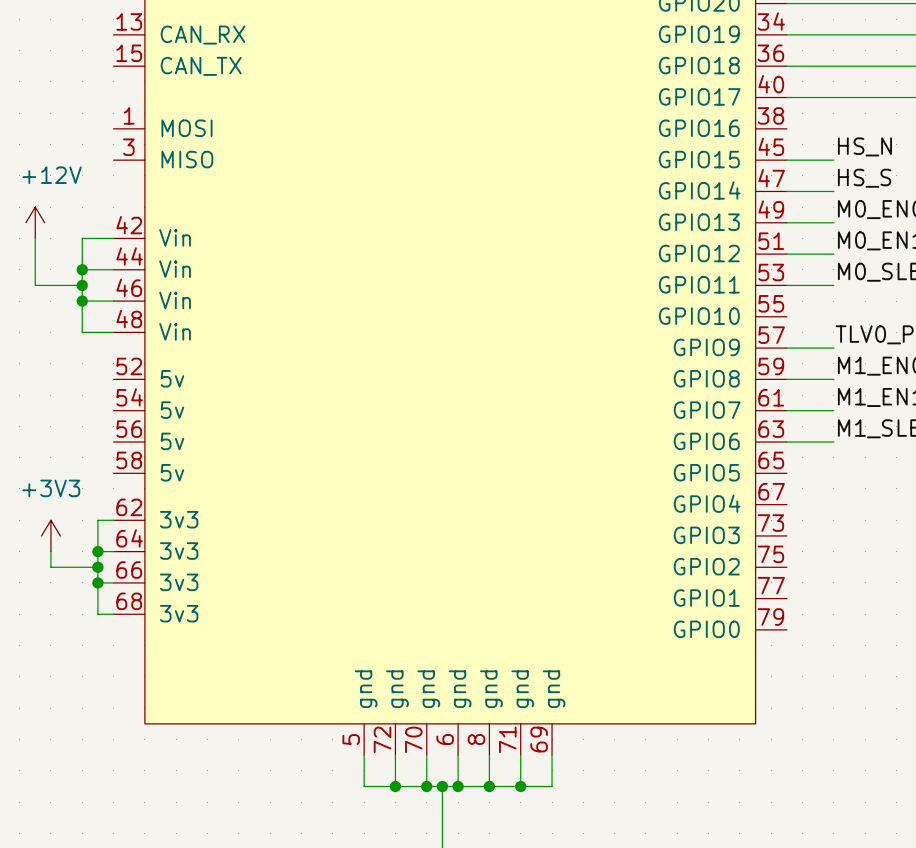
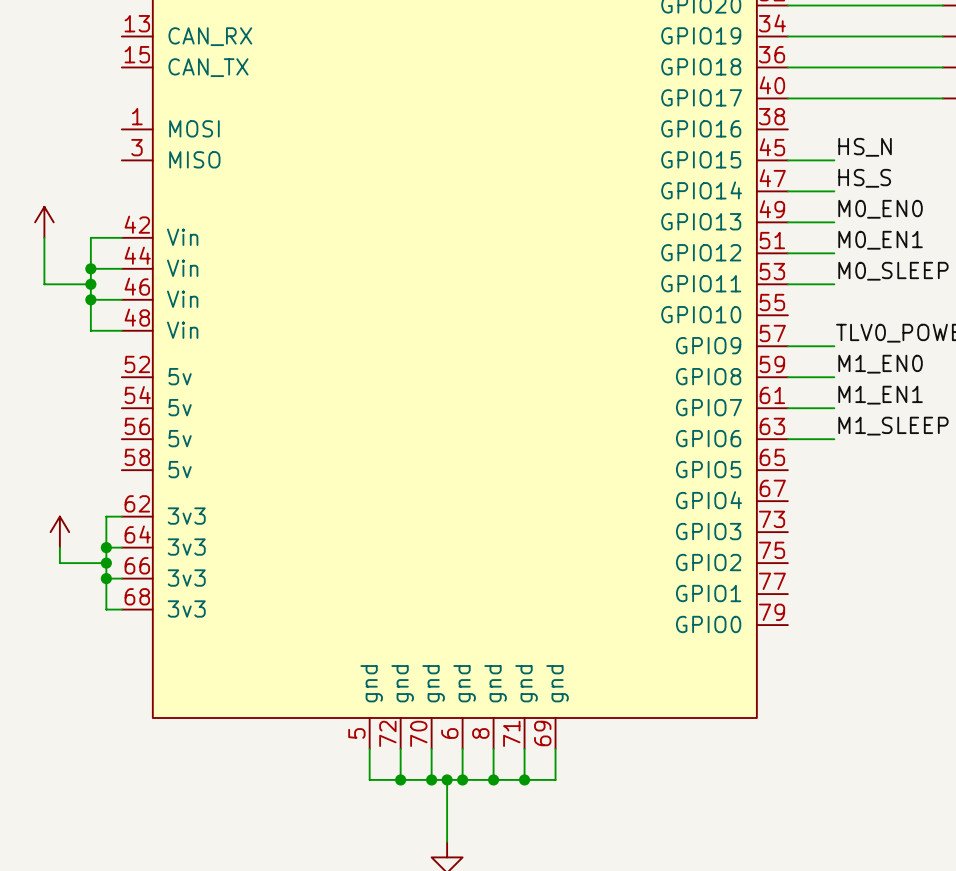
power symbol text: +12V (52, 175) -> none
power symbol text: +3V3 (51, 488) -> none

